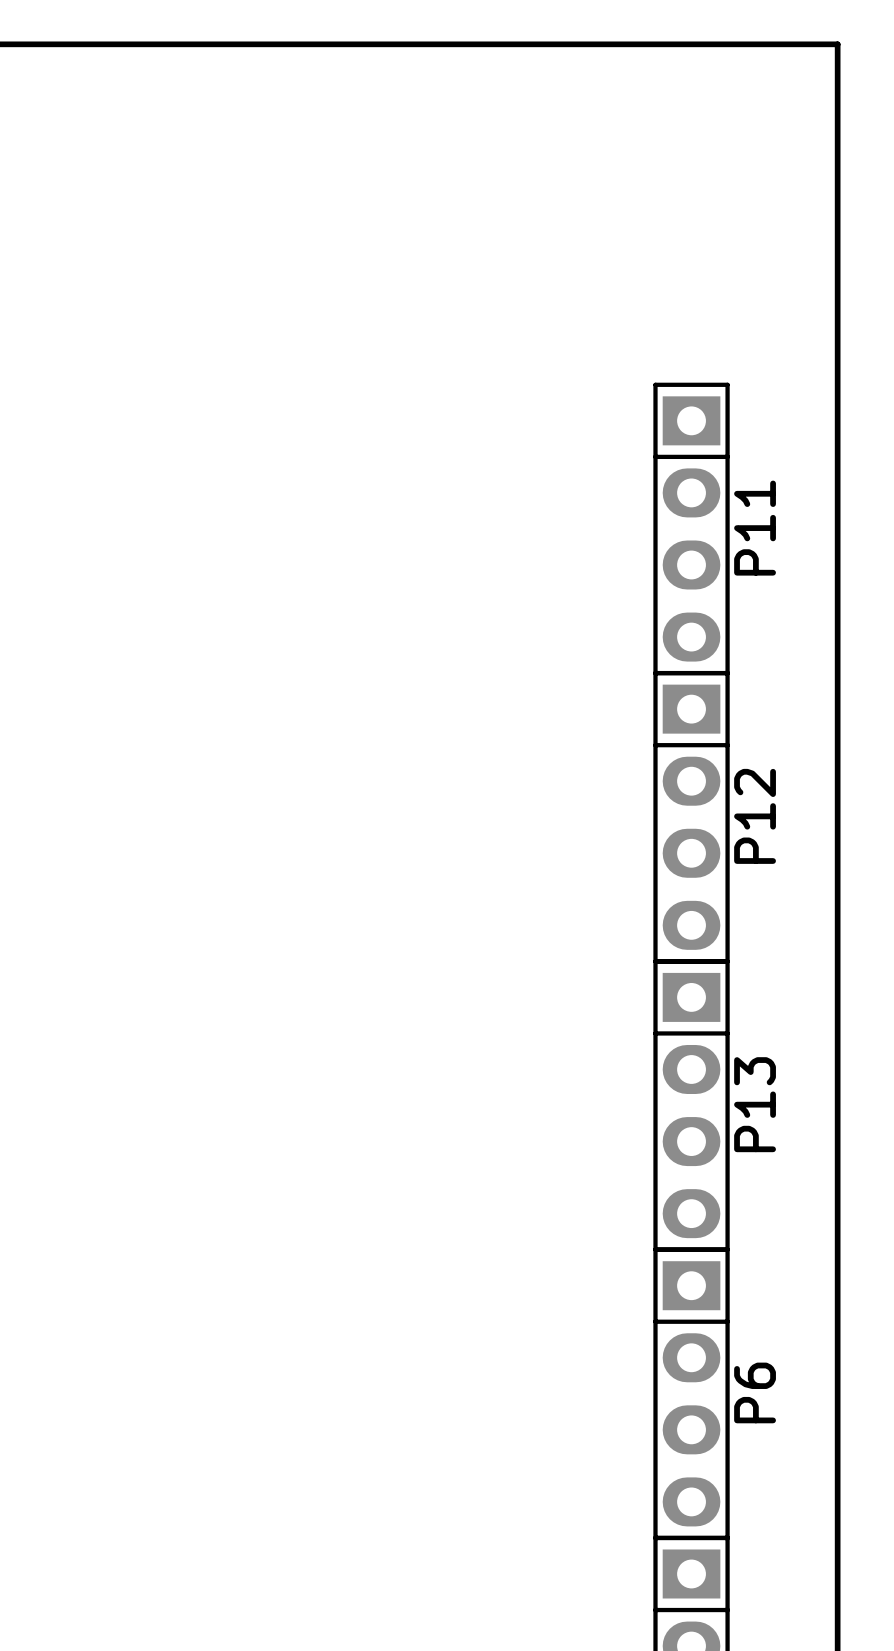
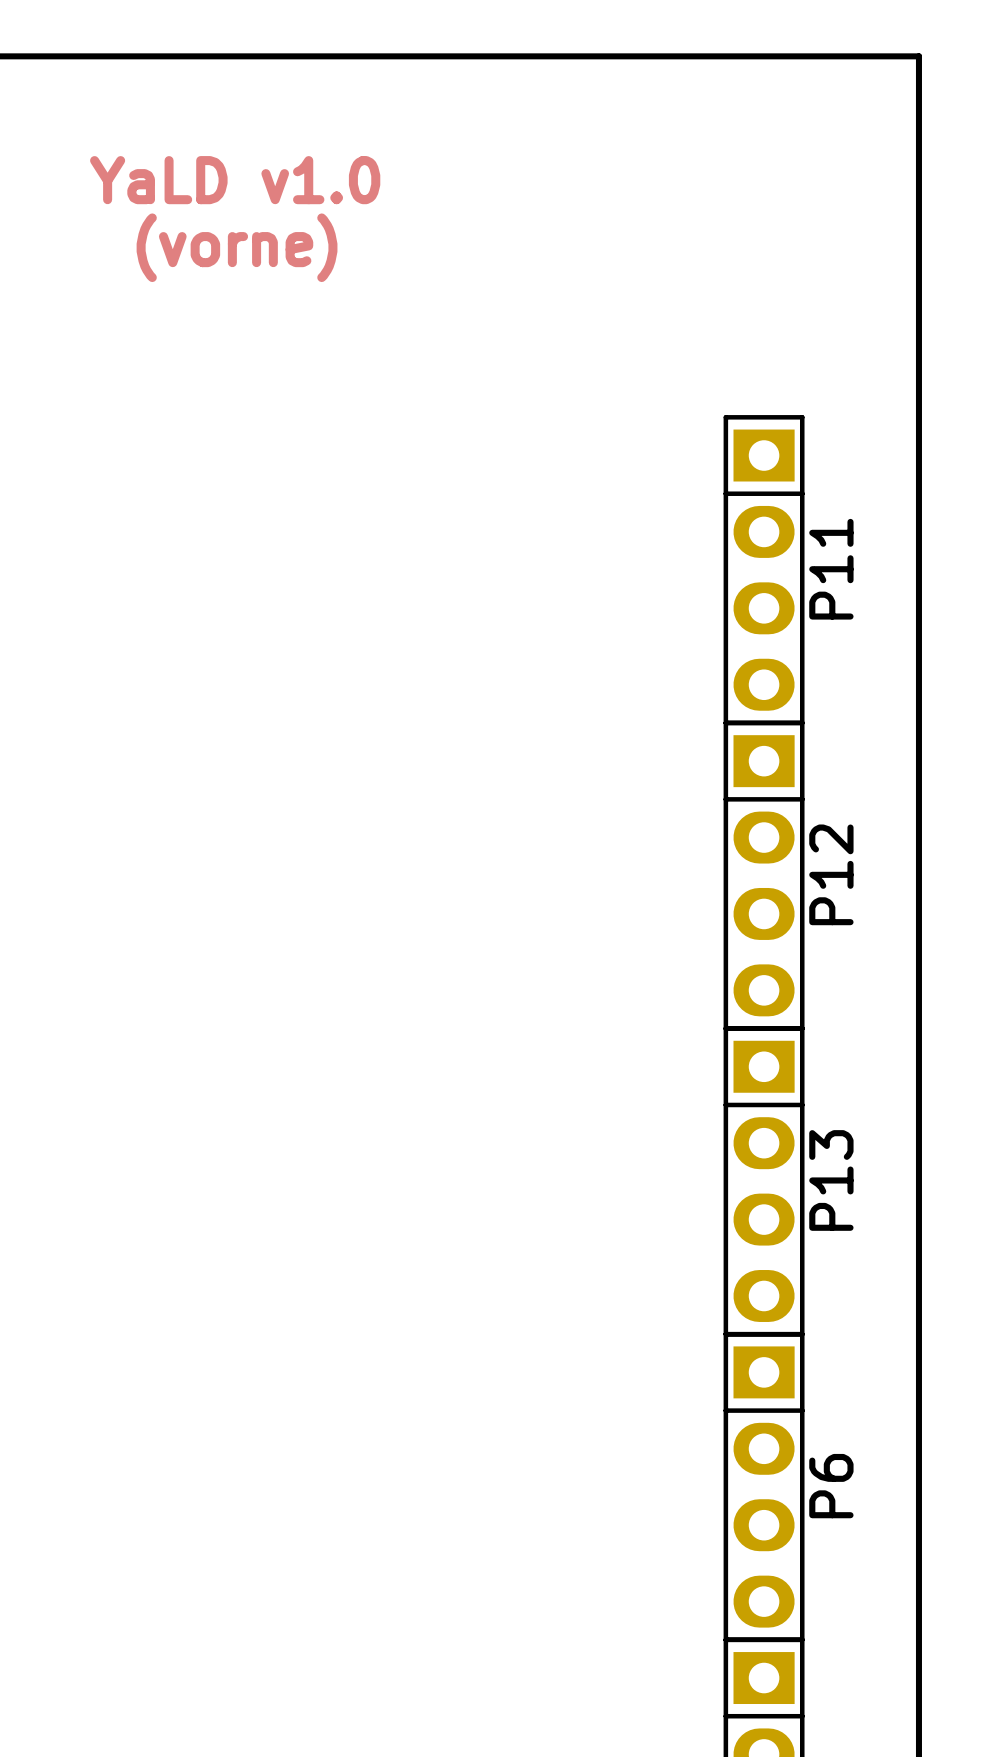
text: none -> YaLD v1.0 (235, 180)
text: none -> (vorne) (237, 247)

